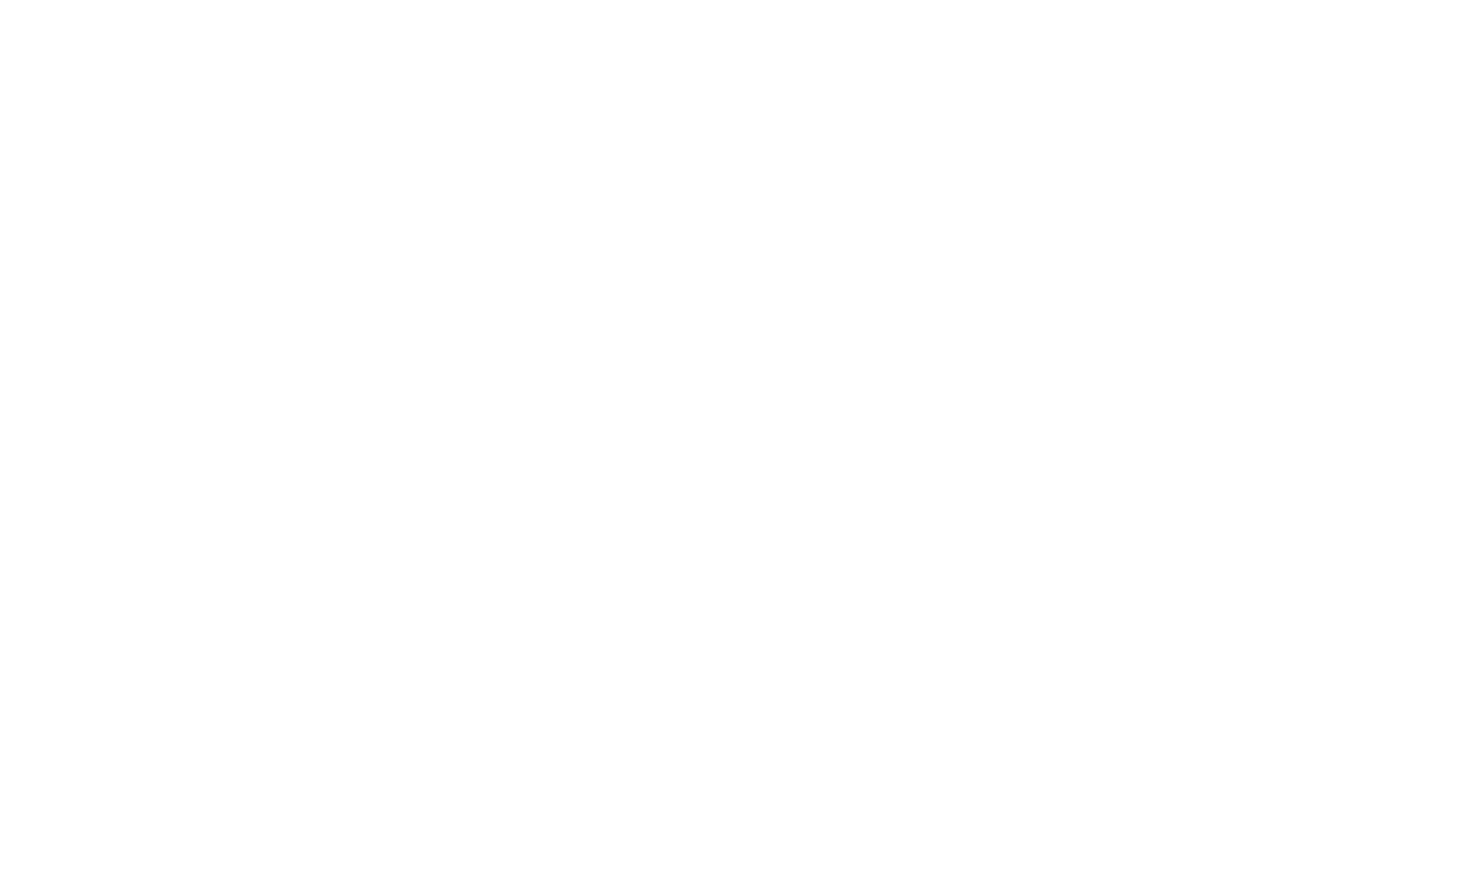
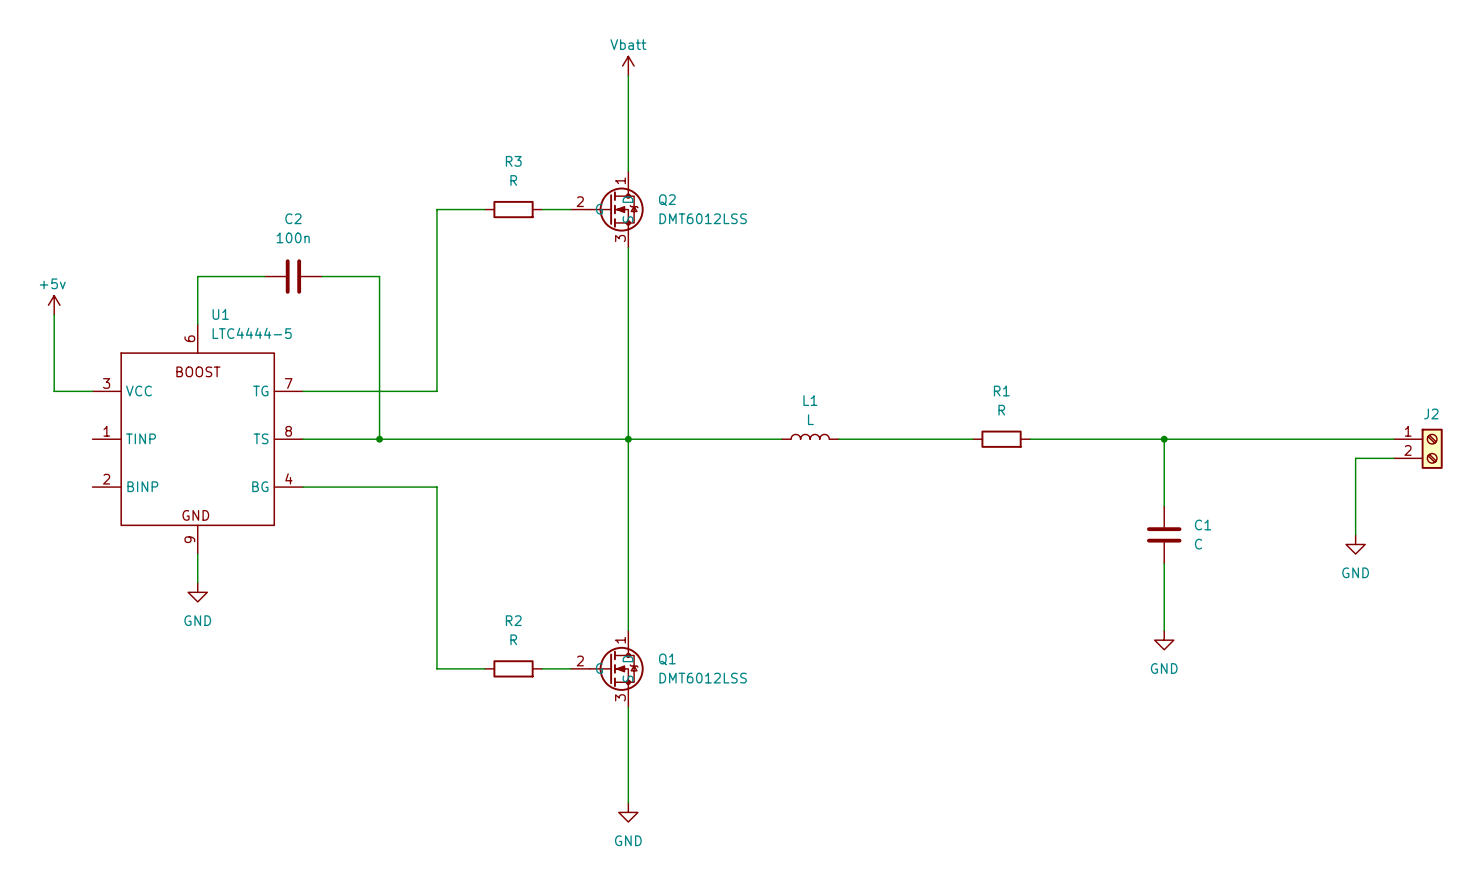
power symbol: none -> Vbatt (628, 66)
wire: none -> (628, 75) (628, 171)
wire: none -> (484, 209) (436, 209) (436, 391) (303, 391)
R3: none -> R (513, 209)
wire: none -> (542, 209) (570, 209)
Q2: none -> DMT6012LSS (607, 209)
wire: none -> (628, 247) (628, 630)
wire: none -> (264, 276) (197, 276) (197, 324)
C2: none -> 100n (293, 276)
wire: none -> (322, 276) (379, 276) (379, 439)
power symbol: none -> +5v (54, 305)
wire: none -> (54, 314) (54, 391) (92, 391)
L1: none -> L (810, 436)
U1: none -> LTC4444-5 (197, 439)
wire: none -> (303, 439) (781, 439)
junction: none -> (379, 439)
junction: none -> (628, 439)
wire: none -> (838, 439) (972, 439)
R1: none -> R (1001, 439)
wire: none -> (1030, 439) (1393, 439)
wire: none -> (1164, 439) (1164, 506)
junction: none -> (1164, 439)
J2: none -> (1418, 448)
wire: none -> (1393, 458) (1355, 458) (1355, 534)
wire: none -> (303, 487) (436, 487) (436, 668) (484, 668)
C1: none -> C (1164, 534)
power symbol: none -> GND (1355, 544)
wire: none -> (197, 554) (197, 582)
wire: none -> (1164, 563) (1164, 630)
power symbol: none -> GND (197, 592)
power symbol: none -> GND (1164, 640)
R2: none -> R (513, 668)
wire: none -> (542, 668) (570, 668)
Q1: none -> DMT6012LSS (607, 668)
wire: none -> (628, 707) (628, 802)
power symbol: none -> GND (628, 812)

